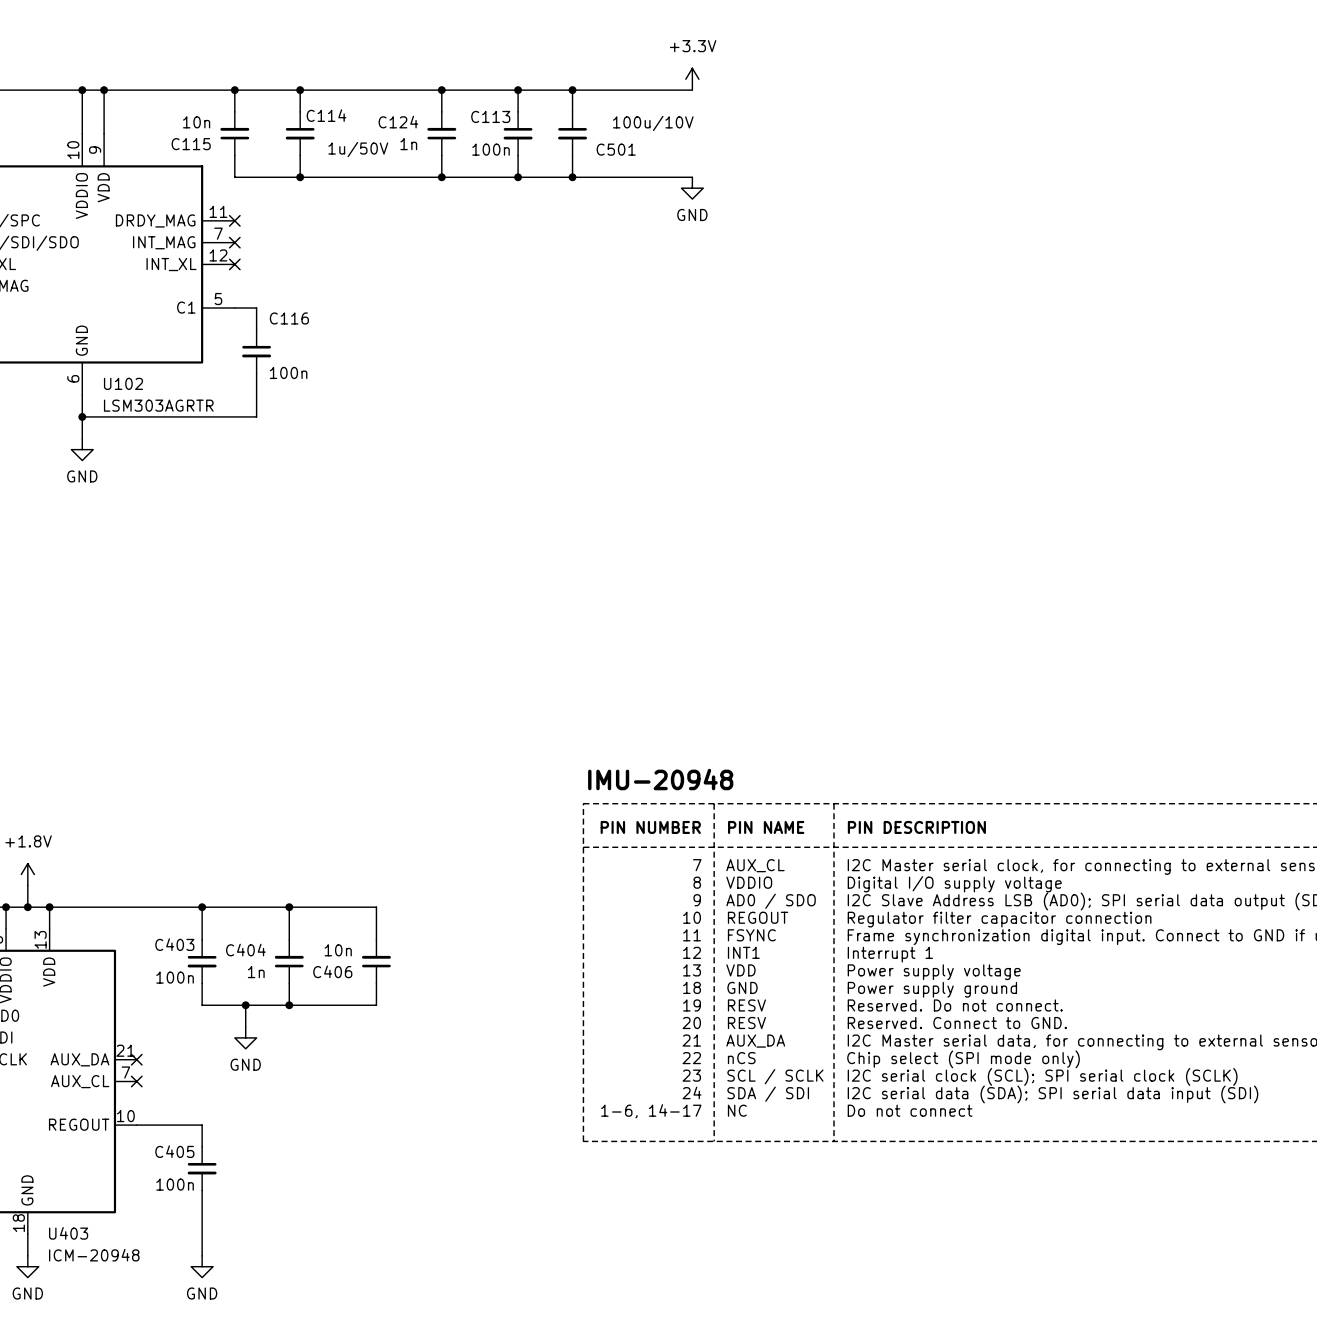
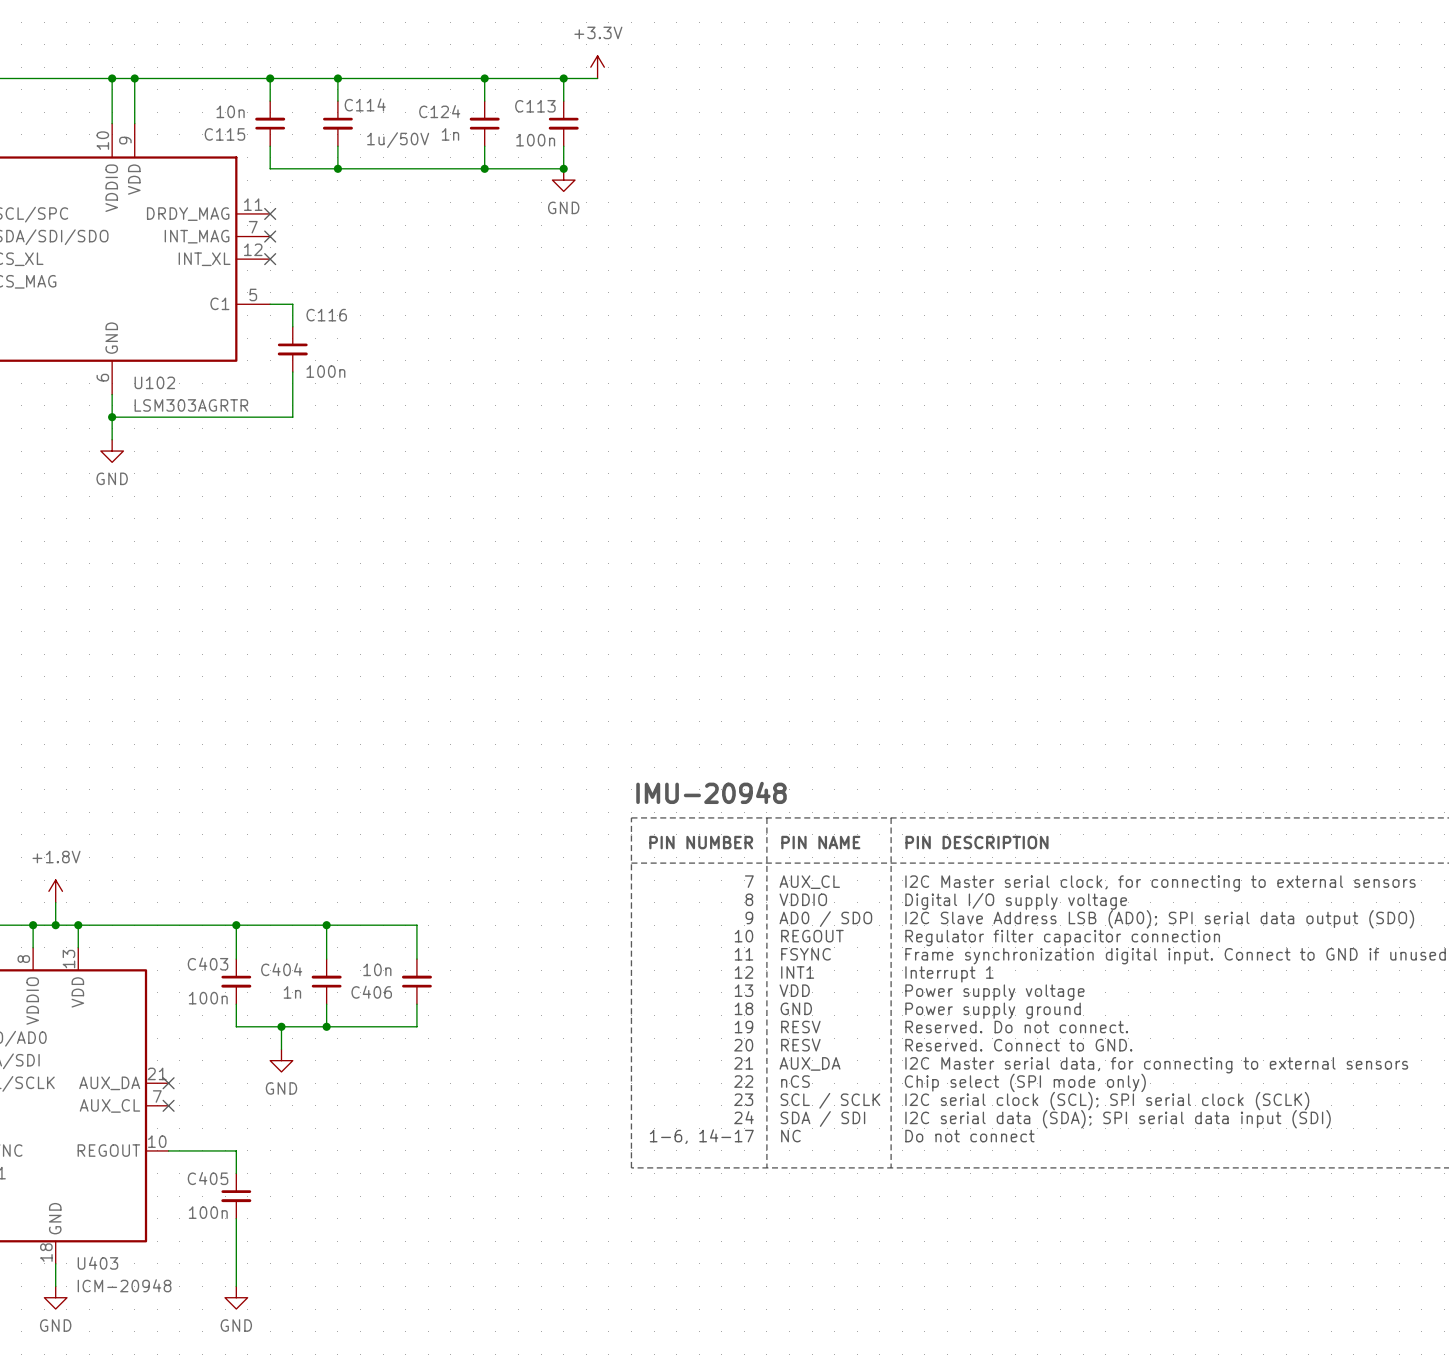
power symbol position: +3.3V (692, 79) -> +3.3V (597, 67)
wire: (550, 90) (692, 90) -> none
wire: (572, 90) (572, 111) -> none
junction: (572, 90) -> none
C501: 100u/10V (572, 133) -> none
wire: (572, 155) (572, 177) -> none
wire: (518, 177) (692, 177) -> none
junction: (572, 177) -> none
power symbol position: GND (692, 188) -> GND (563, 180)

